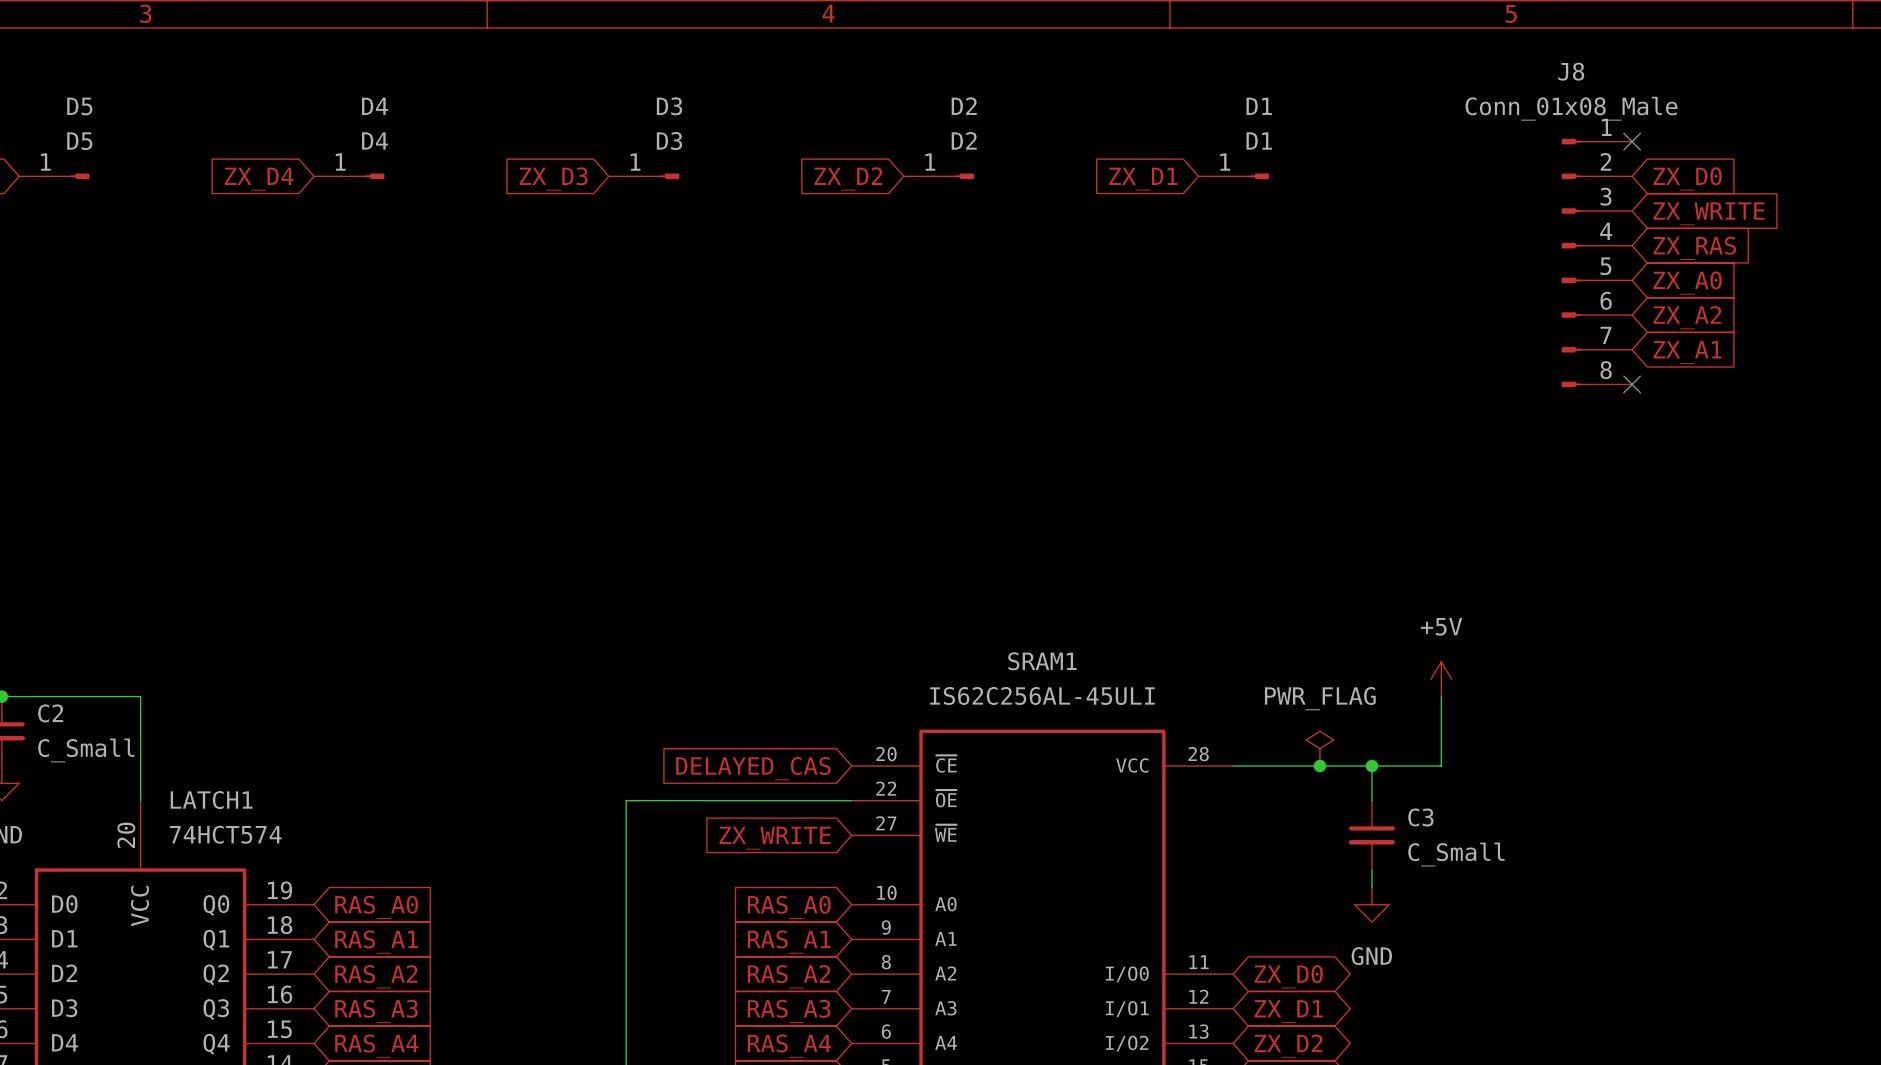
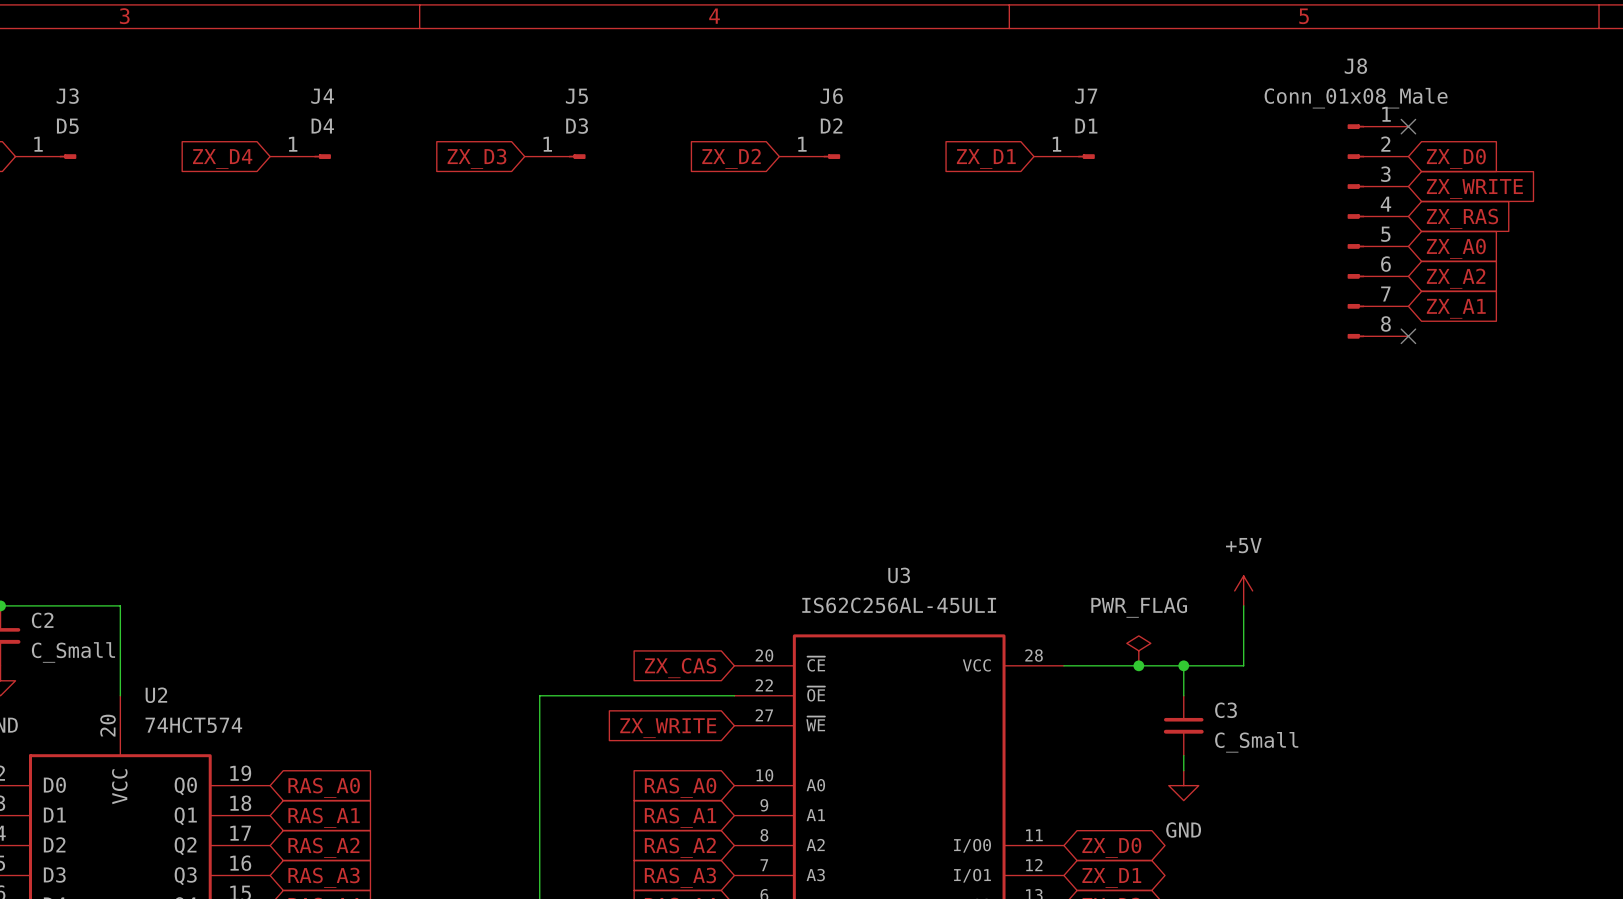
D5 name: D5 (79, 106) -> J3 (67, 96)
D4 name: D4 (374, 106) -> J4 (322, 96)
D3 name: D3 (669, 106) -> J5 (576, 96)
D2 name: D2 (964, 106) -> J6 (831, 96)
D1 name: D1 (1259, 106) -> J7 (1086, 96)
SRAM1 name: SRAM1 (1042, 661) -> U3 (899, 575)
global label: DELAYED_CAS (753, 768) -> ZX_CAS (680, 668)
LATCH1 name: LATCH1 (211, 800) -> U2 (156, 695)

